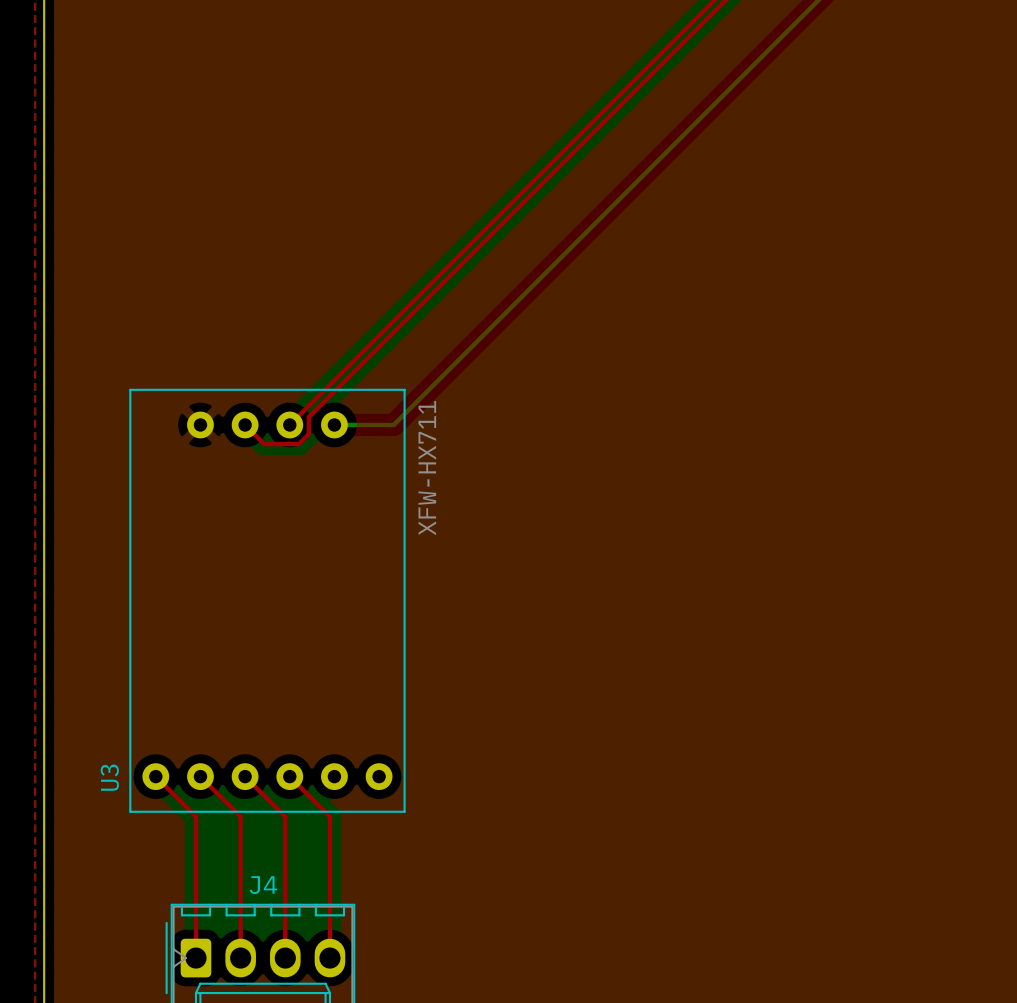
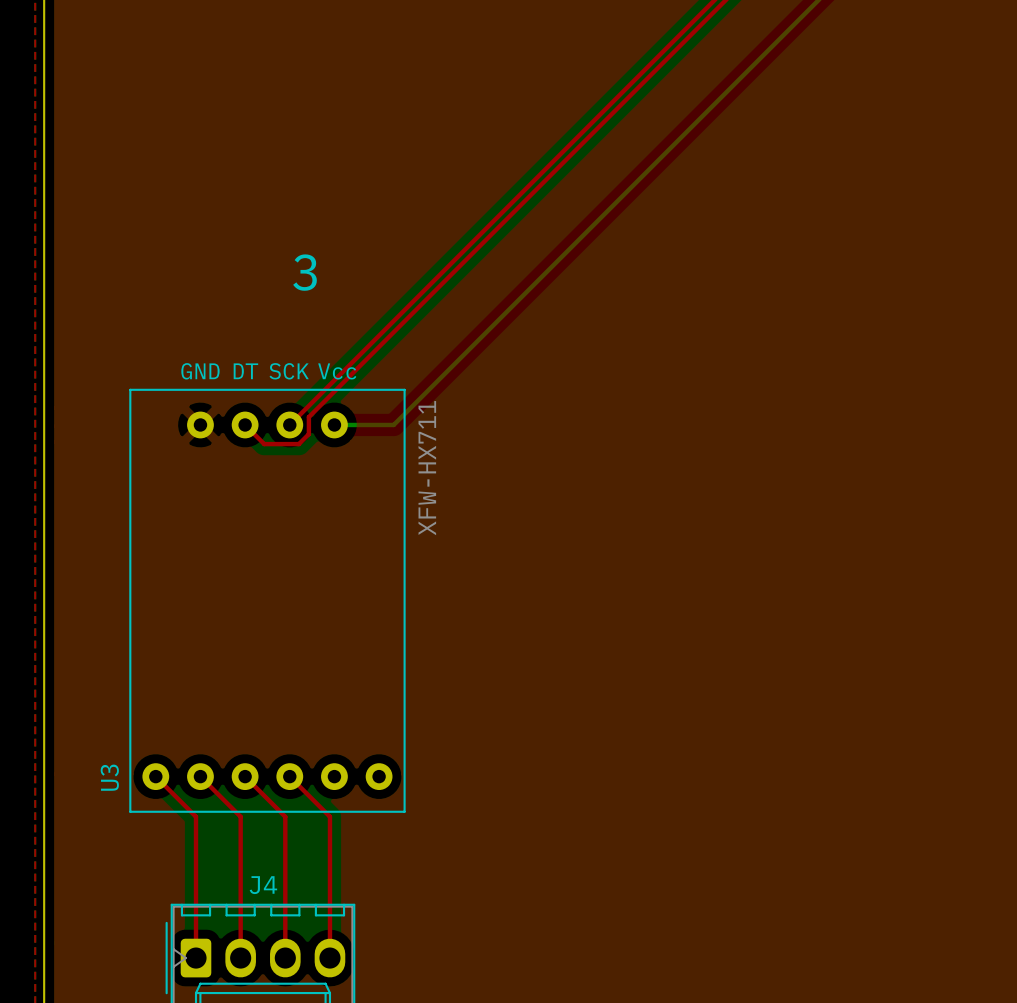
text: none -> 3 (305, 272)
text: none -> GND (200, 371)
text: none -> DT (245, 371)
text: none -> SCK (289, 371)
text: none -> Vcc (337, 371)

